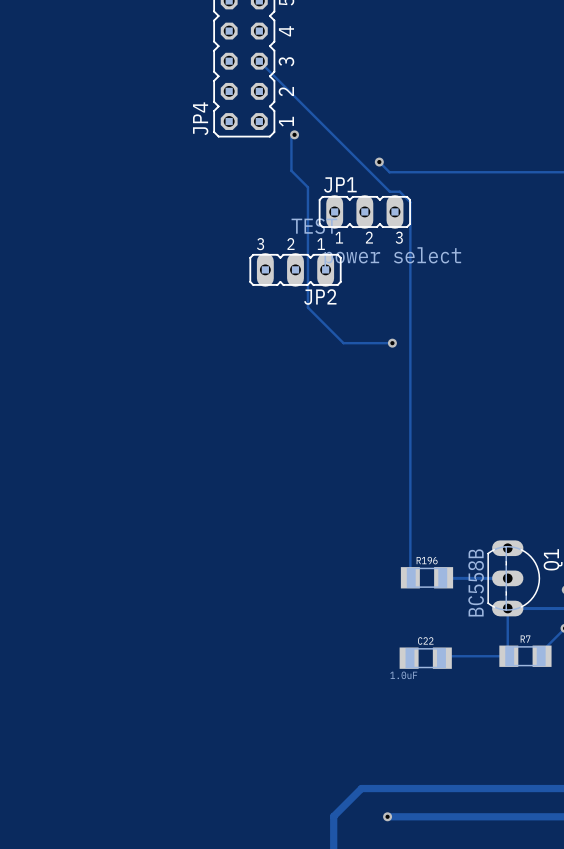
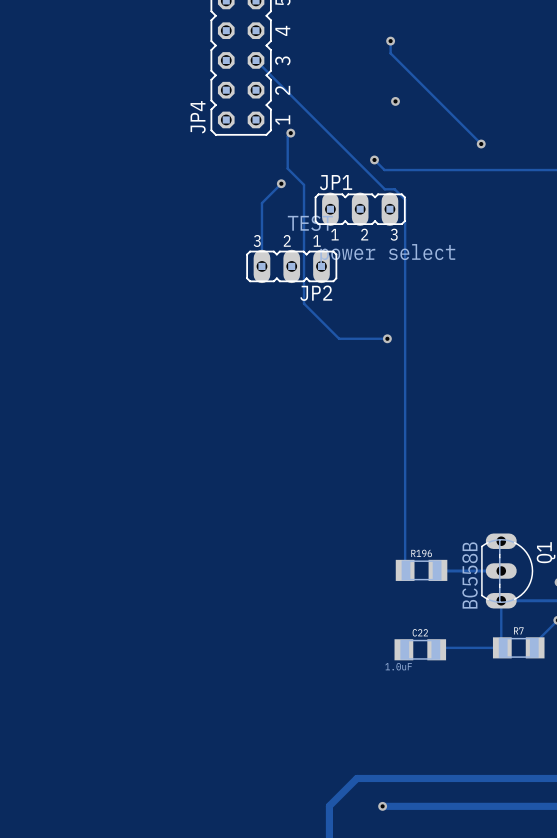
track: none -> (390, 41) (390, 53) (481, 144)
via: none -> (390, 41)
via: none -> (395, 101)
via: none -> (481, 144)
track: none -> (281, 183) (261, 203) (261, 266)
via: none -> (281, 183)

